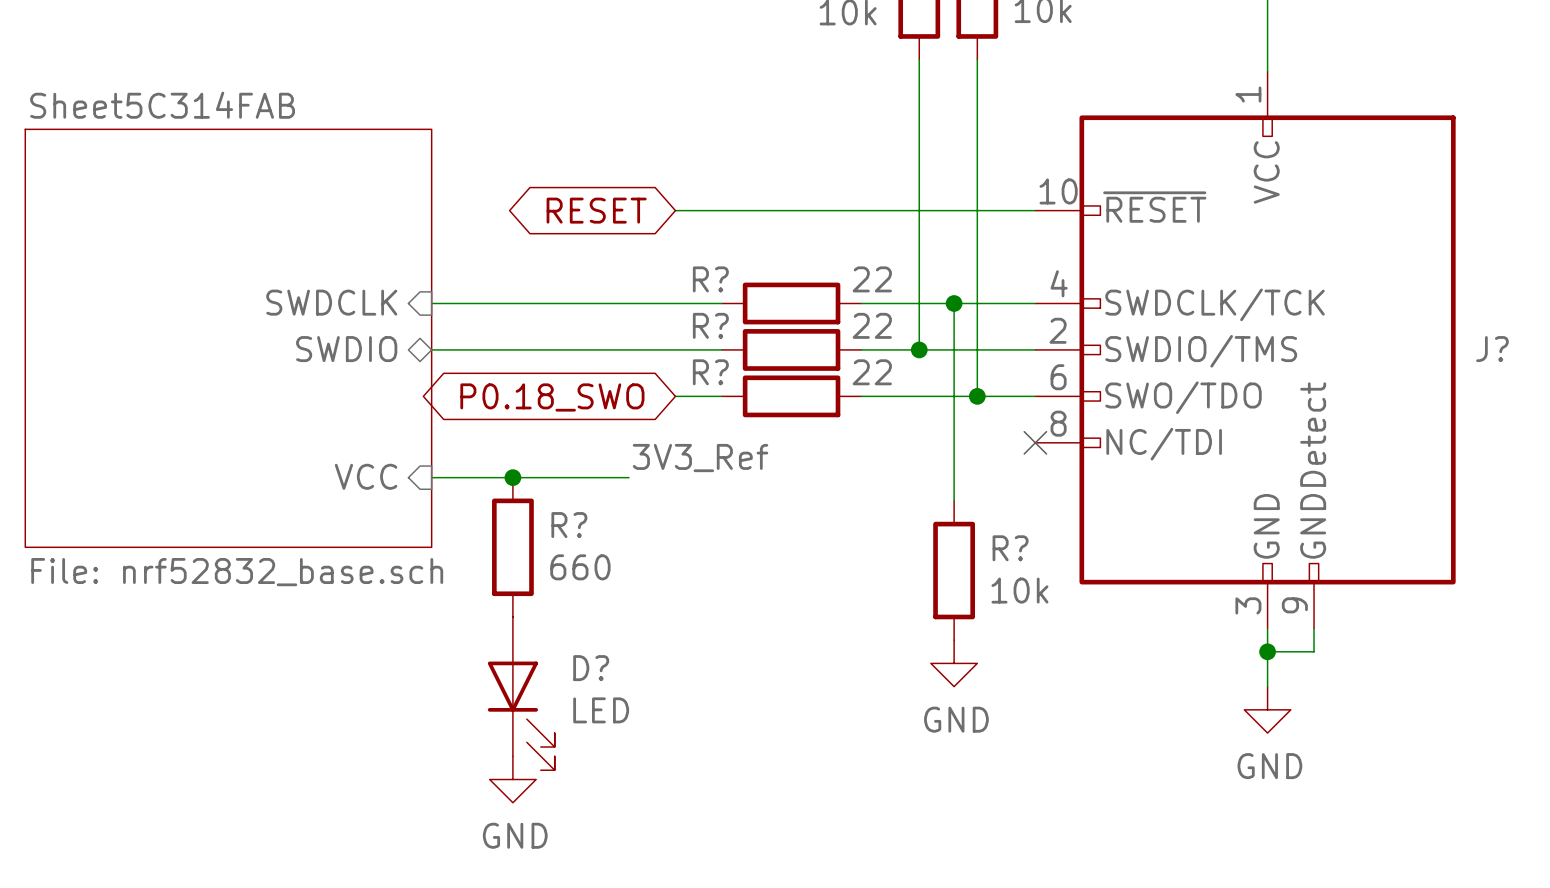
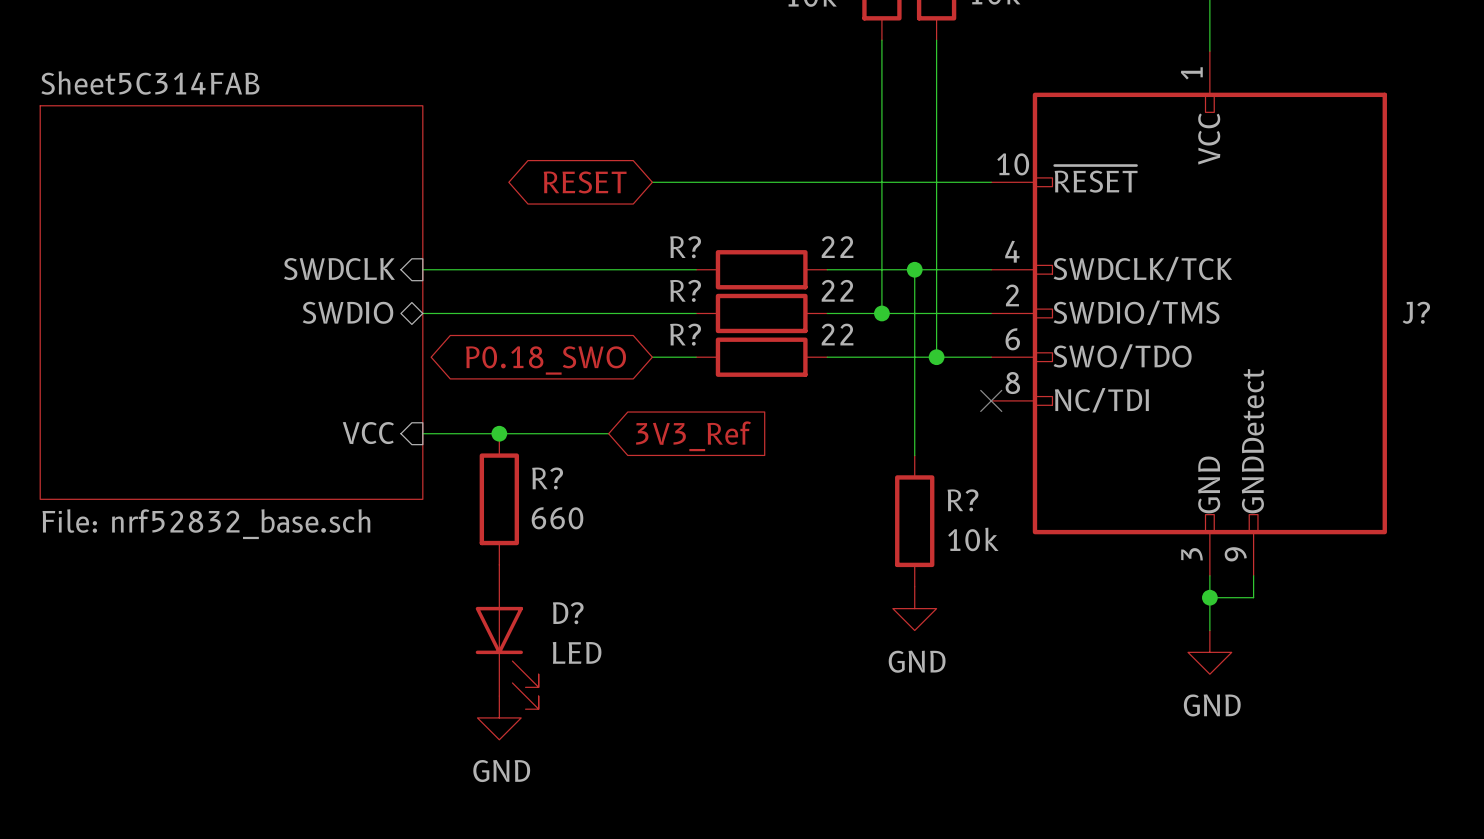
label: 3V3_Ref (700, 458) -> none
global label: none -> 3V3_Ref (693, 436)

